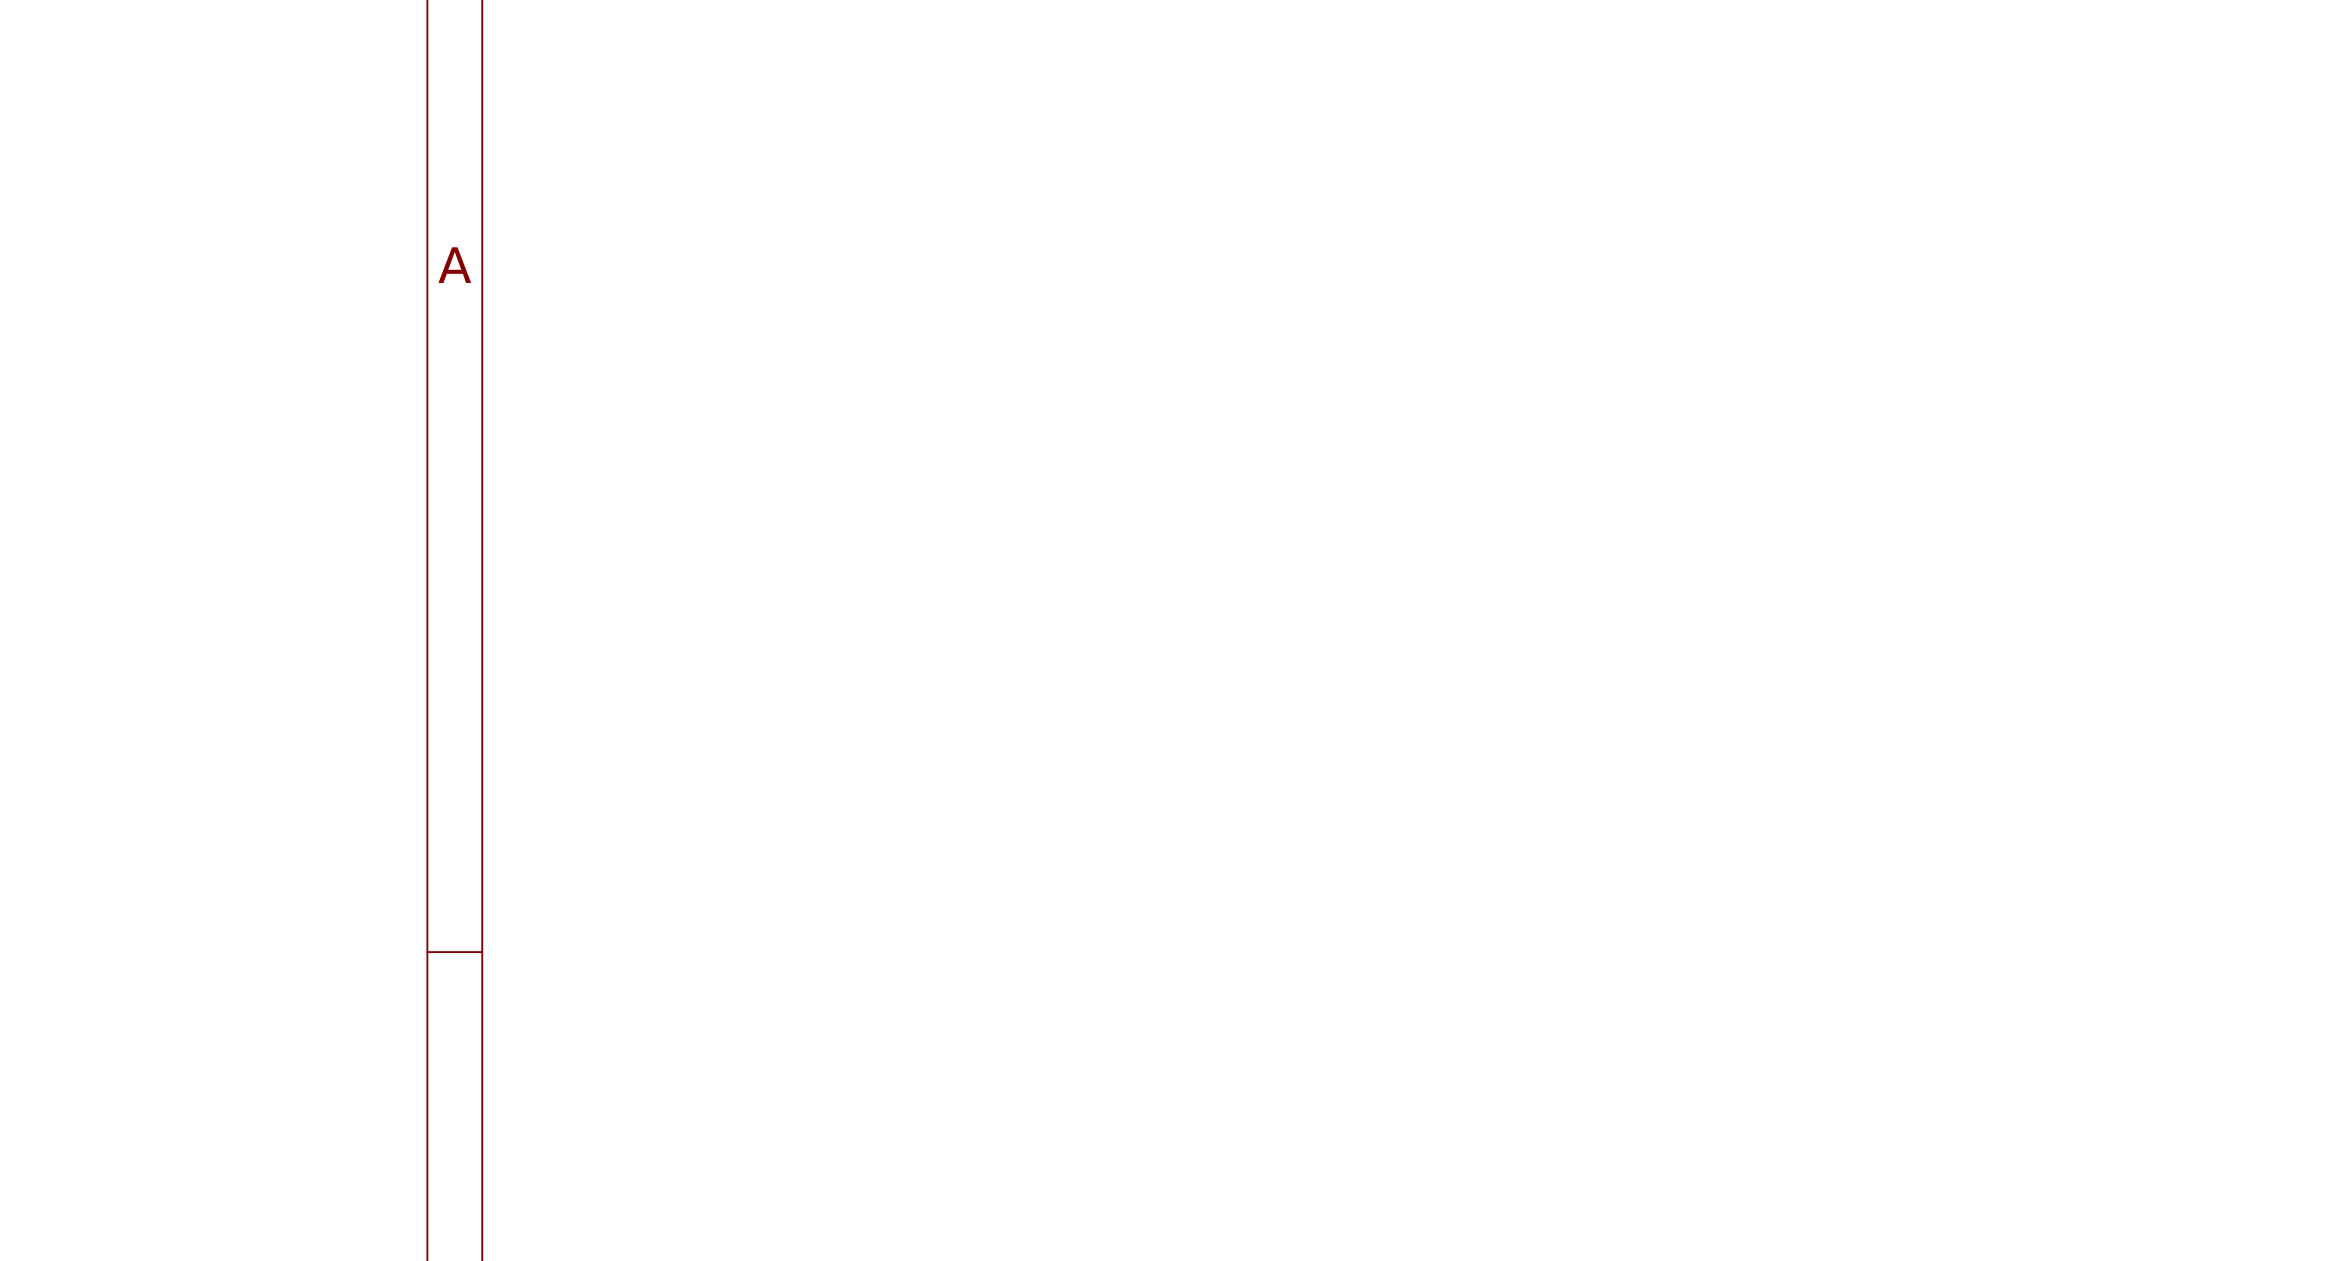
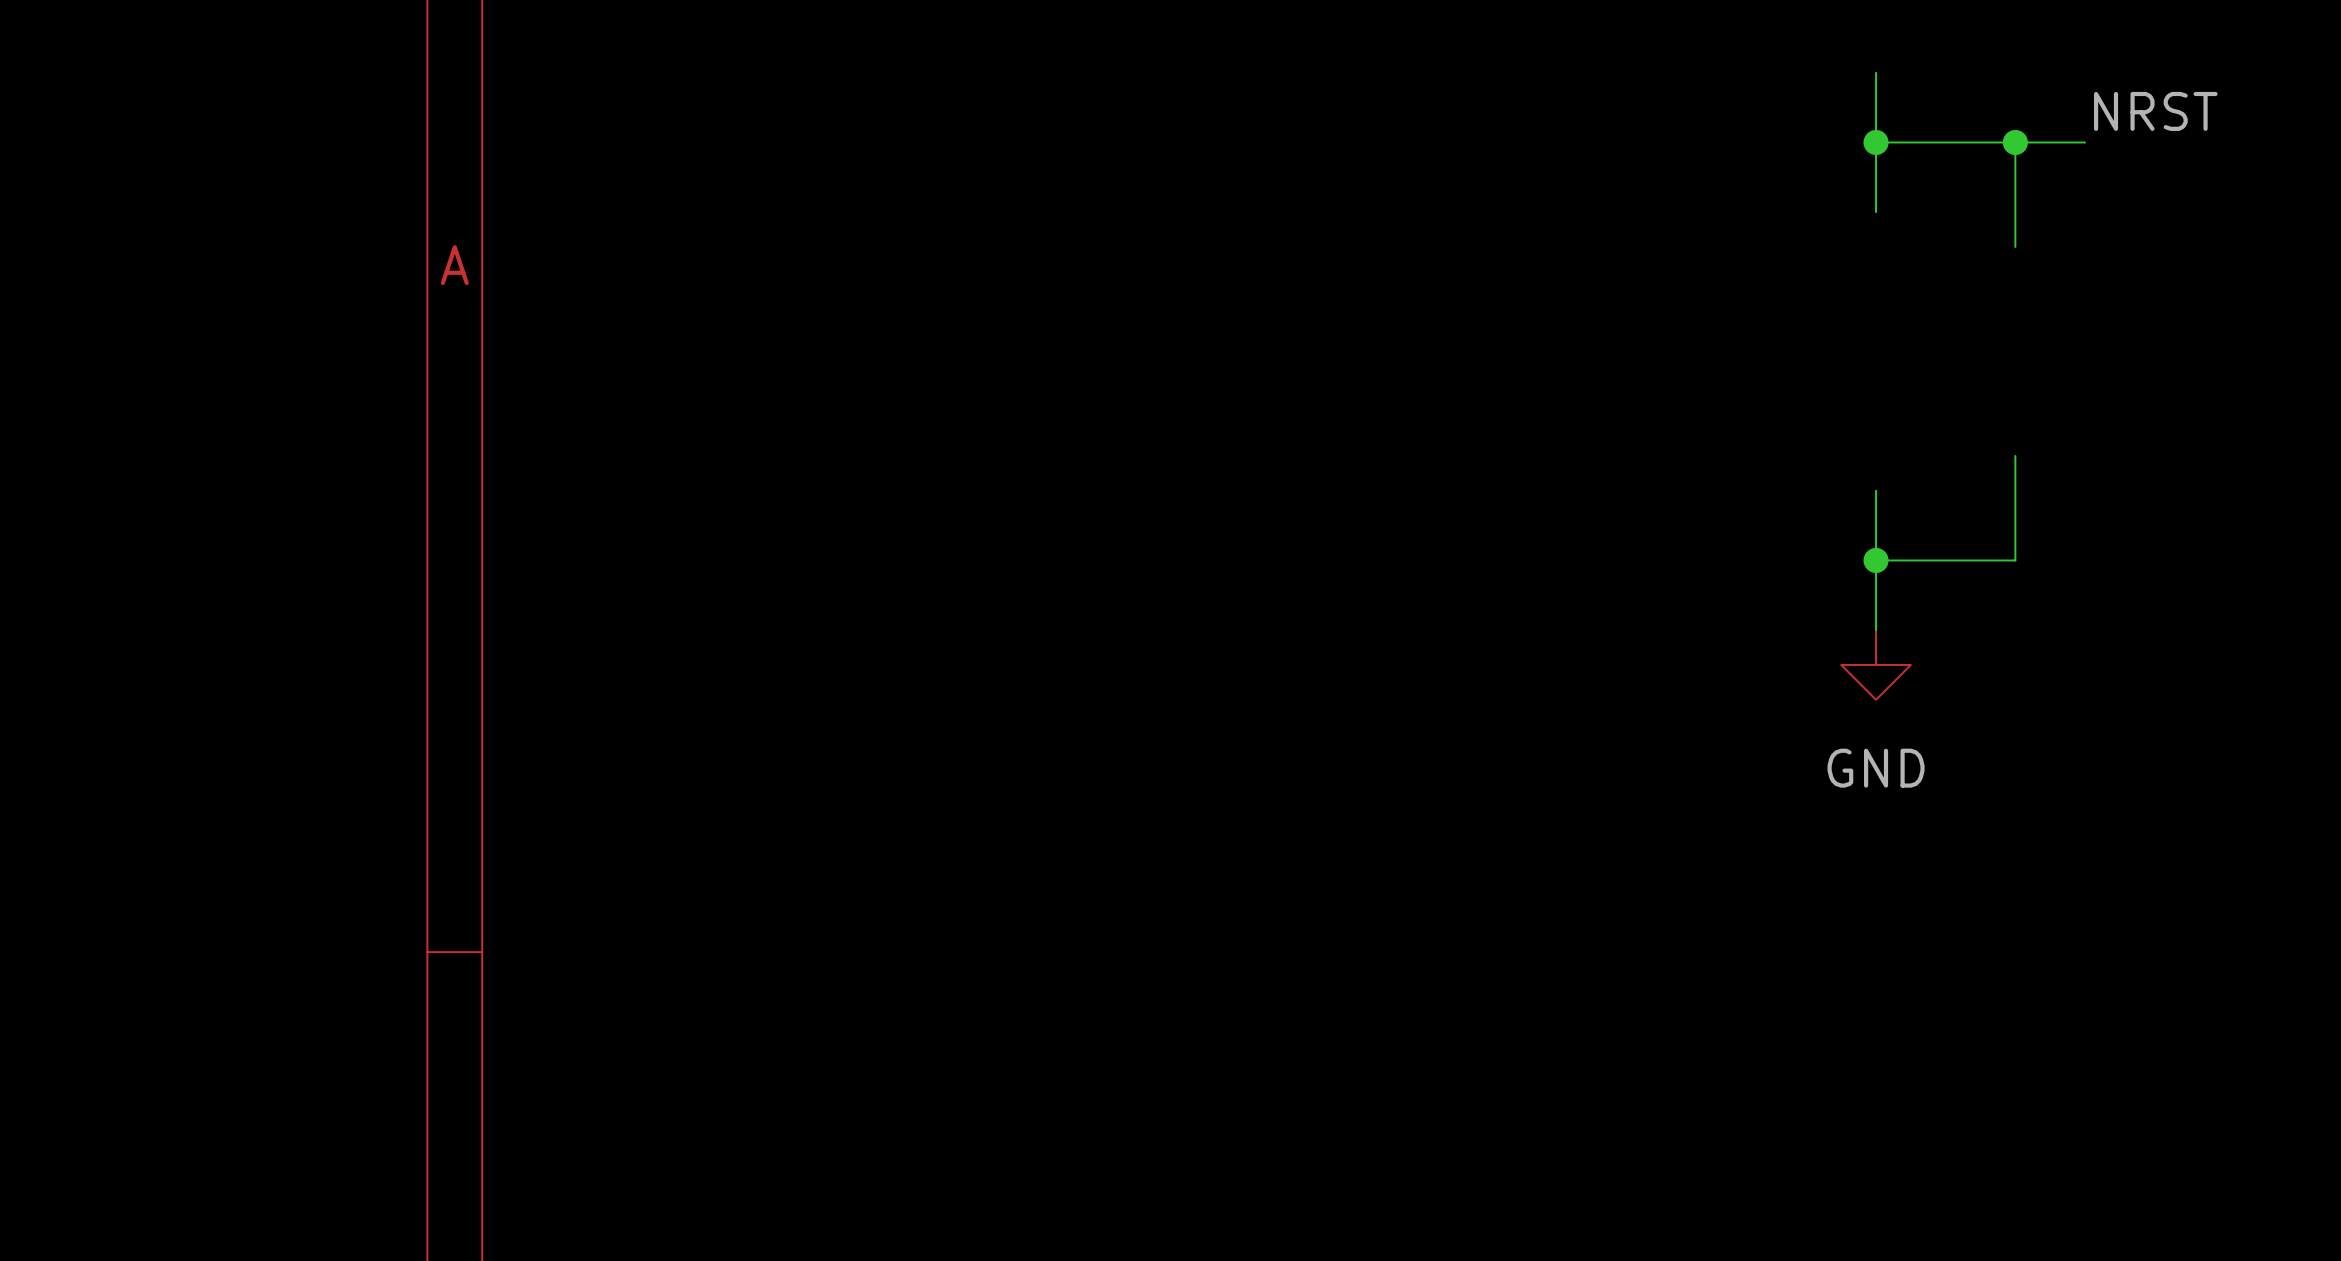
wire: none -> (1876, 72) (1876, 212)
label: none -> NRST (2155, 111)
wire: none -> (1876, 142) (2085, 142)
junction: none -> (1876, 142)
wire: none -> (2015, 142) (2015, 246)
junction: none -> (2015, 142)
wire: none -> (2015, 455) (2015, 560) (1876, 560)
wire: none -> (1876, 490) (1876, 630)
junction: none -> (1876, 560)
power symbol: none -> GND (1876, 664)

